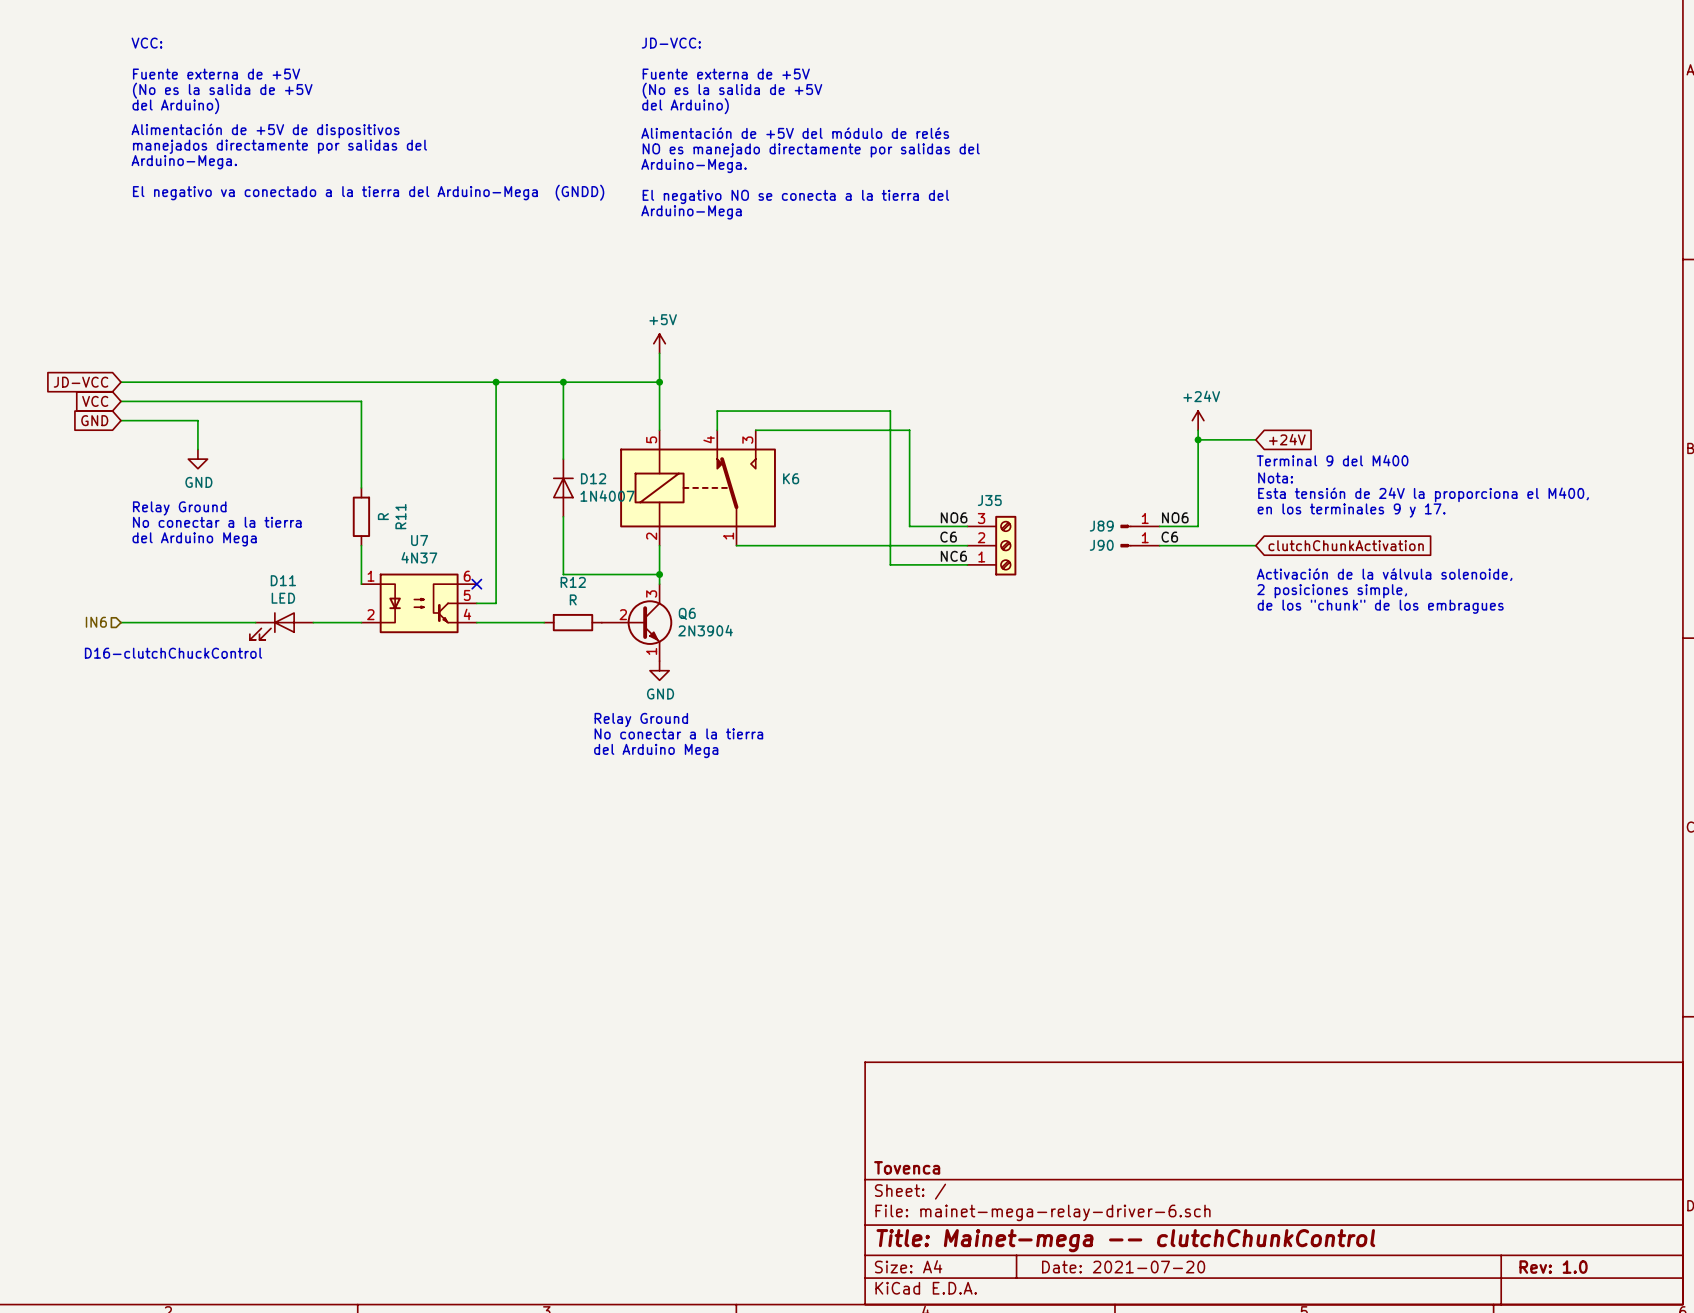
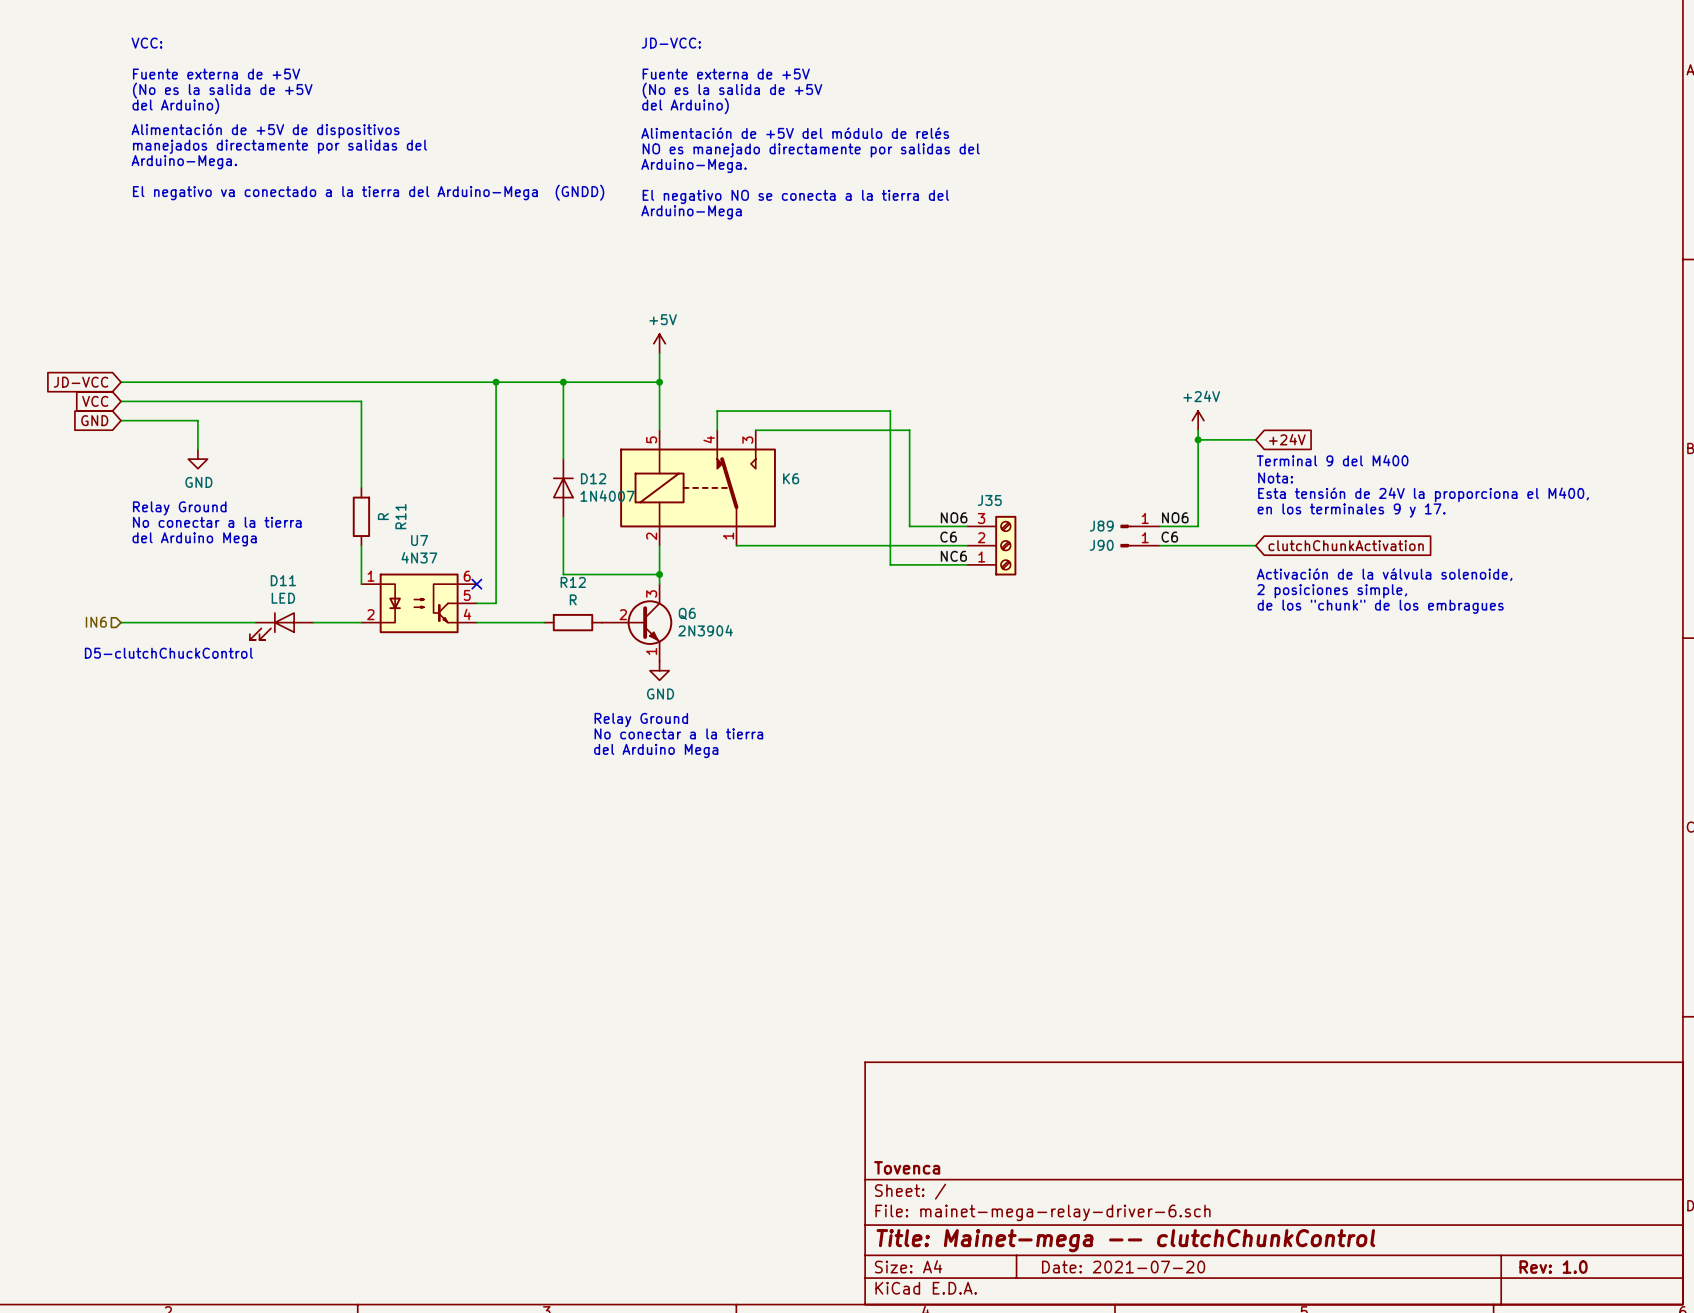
text: D16-clutchChuckControl (173, 653) -> D5-clutchChuckControl (168, 653)

